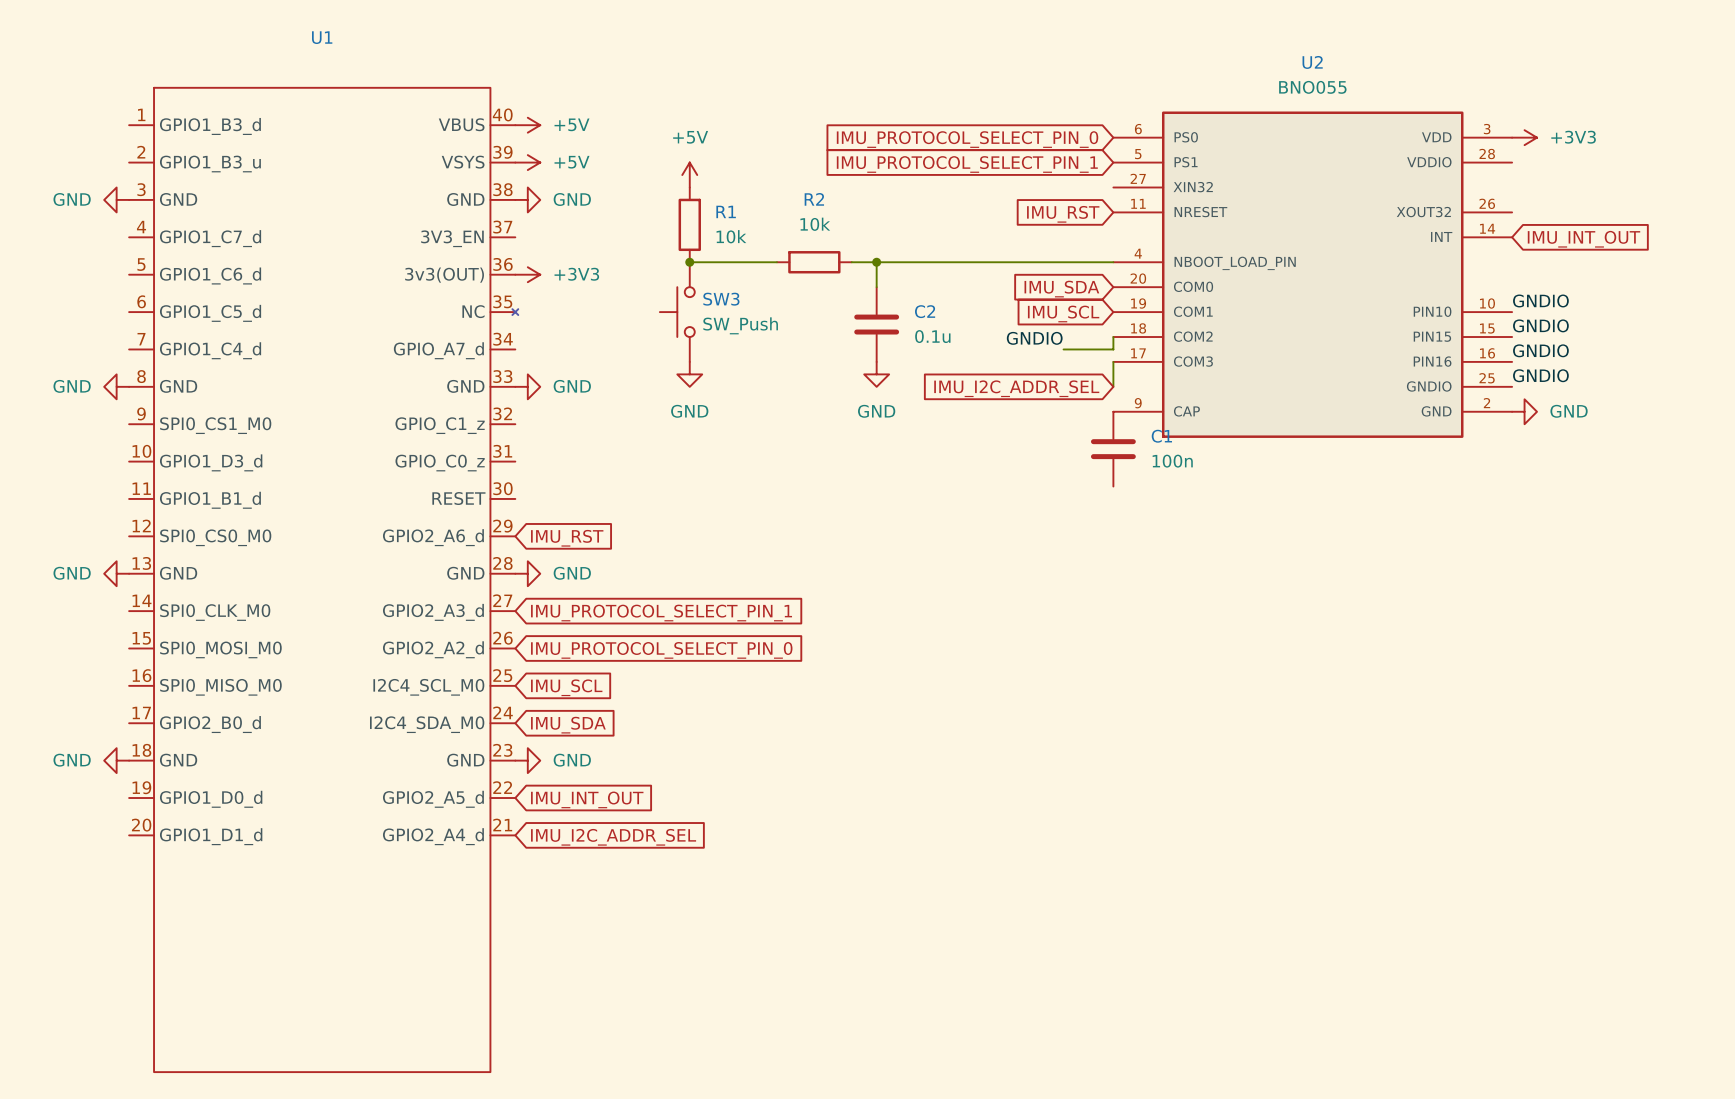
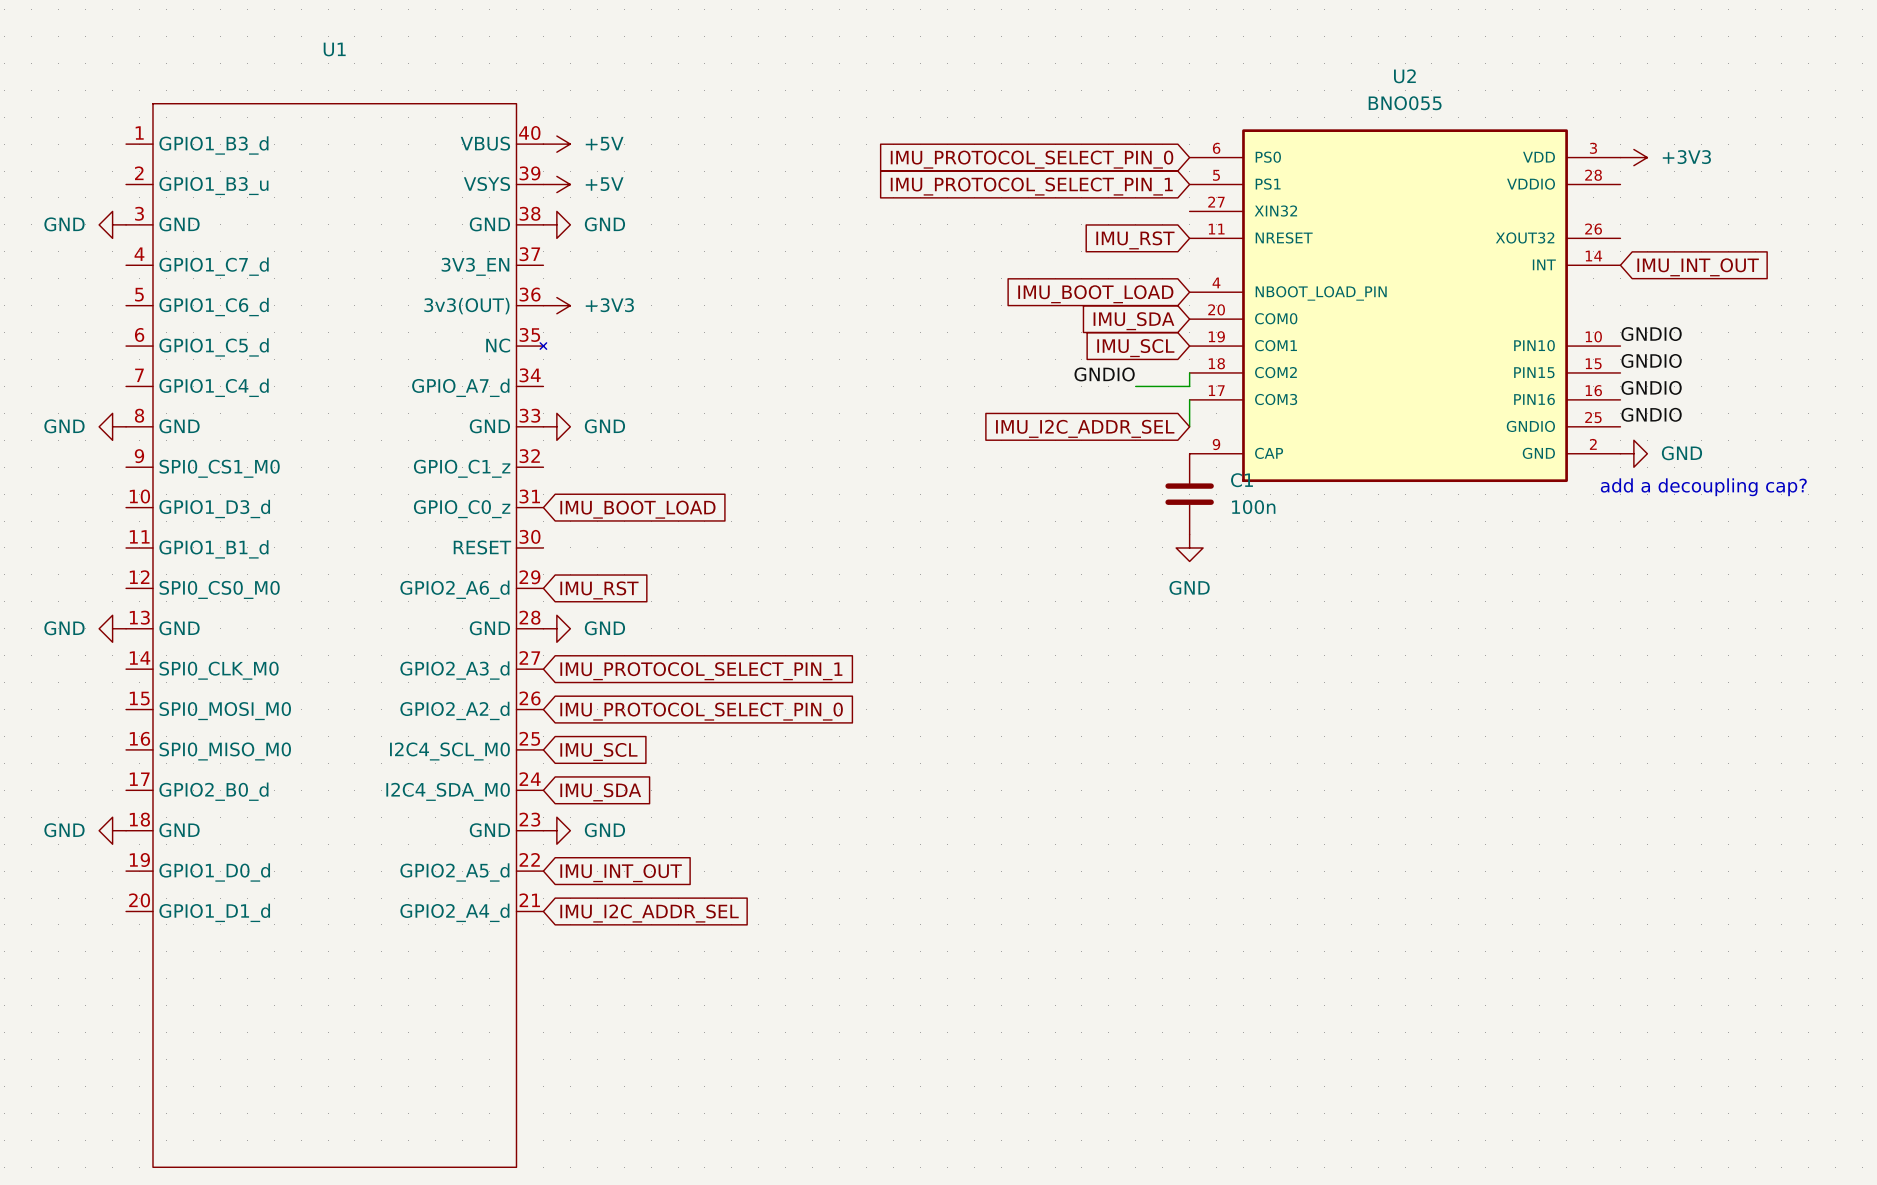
power symbol: +5V (689, 175) -> none
R1: 10k (689, 224) -> none
wire: (689, 262) (776, 262) -> none
junction: (689, 262) -> none
R2: 10k (814, 262) -> none
wire: (851, 262) (1113, 262) -> none
wire: (876, 262) (876, 287) -> none
junction: (876, 262) -> none
global label: none -> IMU_BOOT_LOAD (1095, 294)
SW3: SW_Push (677, 312) -> none
C2: 0.1u (876, 324) -> none
power symbol: GND (689, 374) -> none
power symbol: GND (876, 374) -> none
text: none -> add a decoupling cap? (1703, 487)
global label: none -> IMU_BOOT_LOAD (637, 509)
power symbol: none -> GND (1189, 547)

